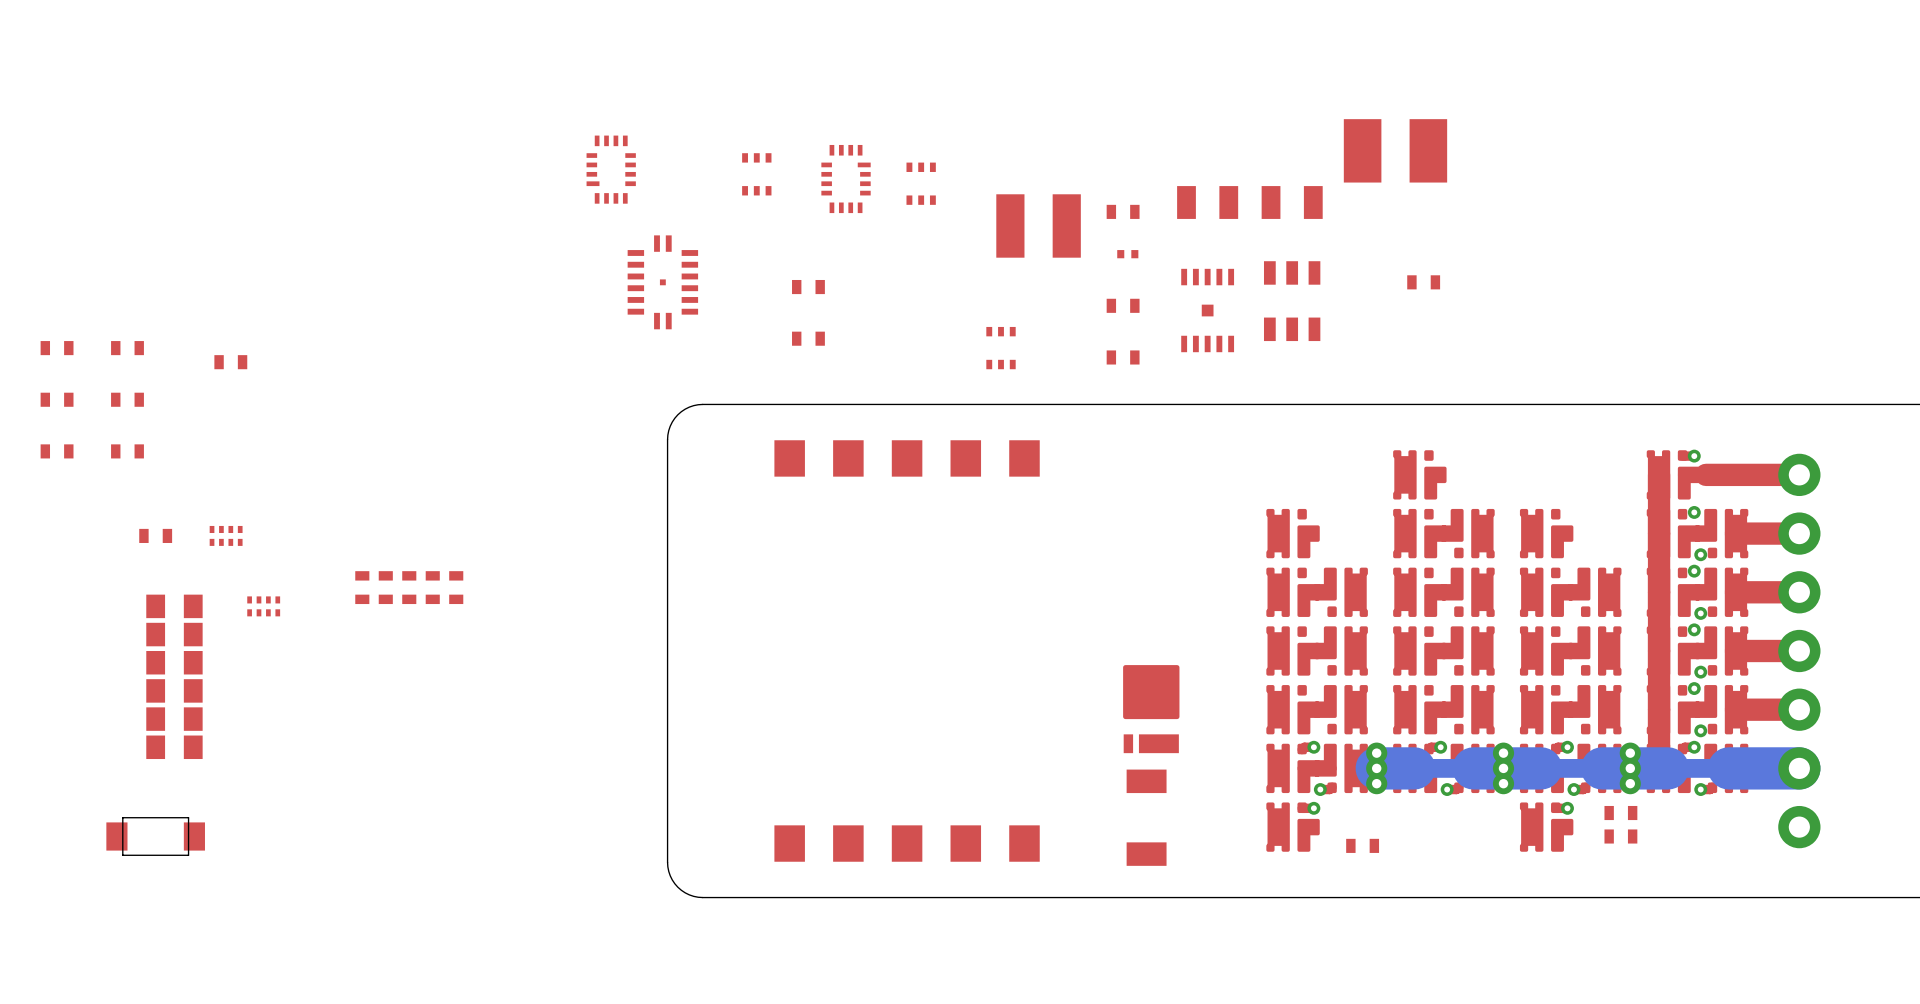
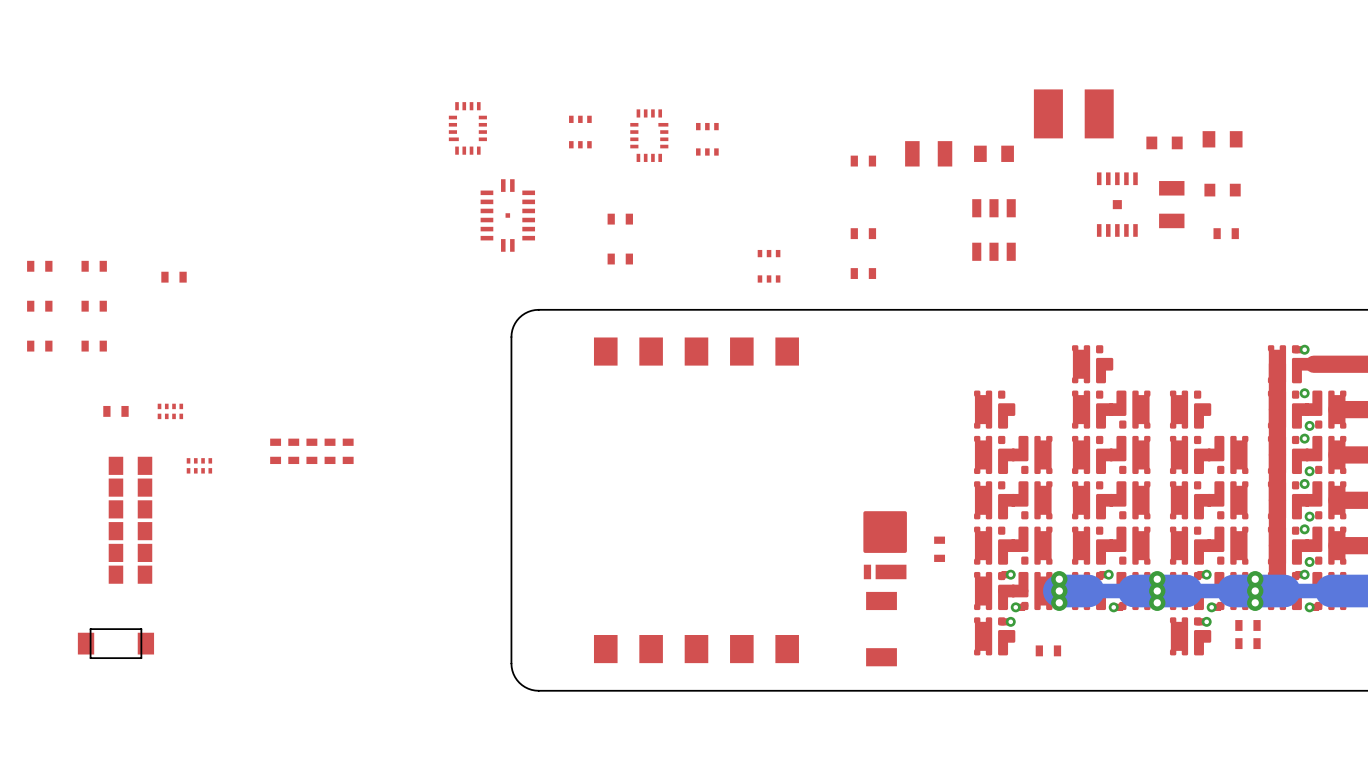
part: none -> (1222, 139)
part footprint: [1261, 186, 1323, 219] -> [974, 145, 1014, 162]
part: none -> (1164, 142)
part: (1038, 225) -> none
part: none -> (1222, 190)
part: (1127, 254) -> none
part: none -> (1171, 204)
part position: (1423, 282) -> (1226, 233)
part position: (1207, 310) -> (1117, 204)
part: none -> (939, 549)

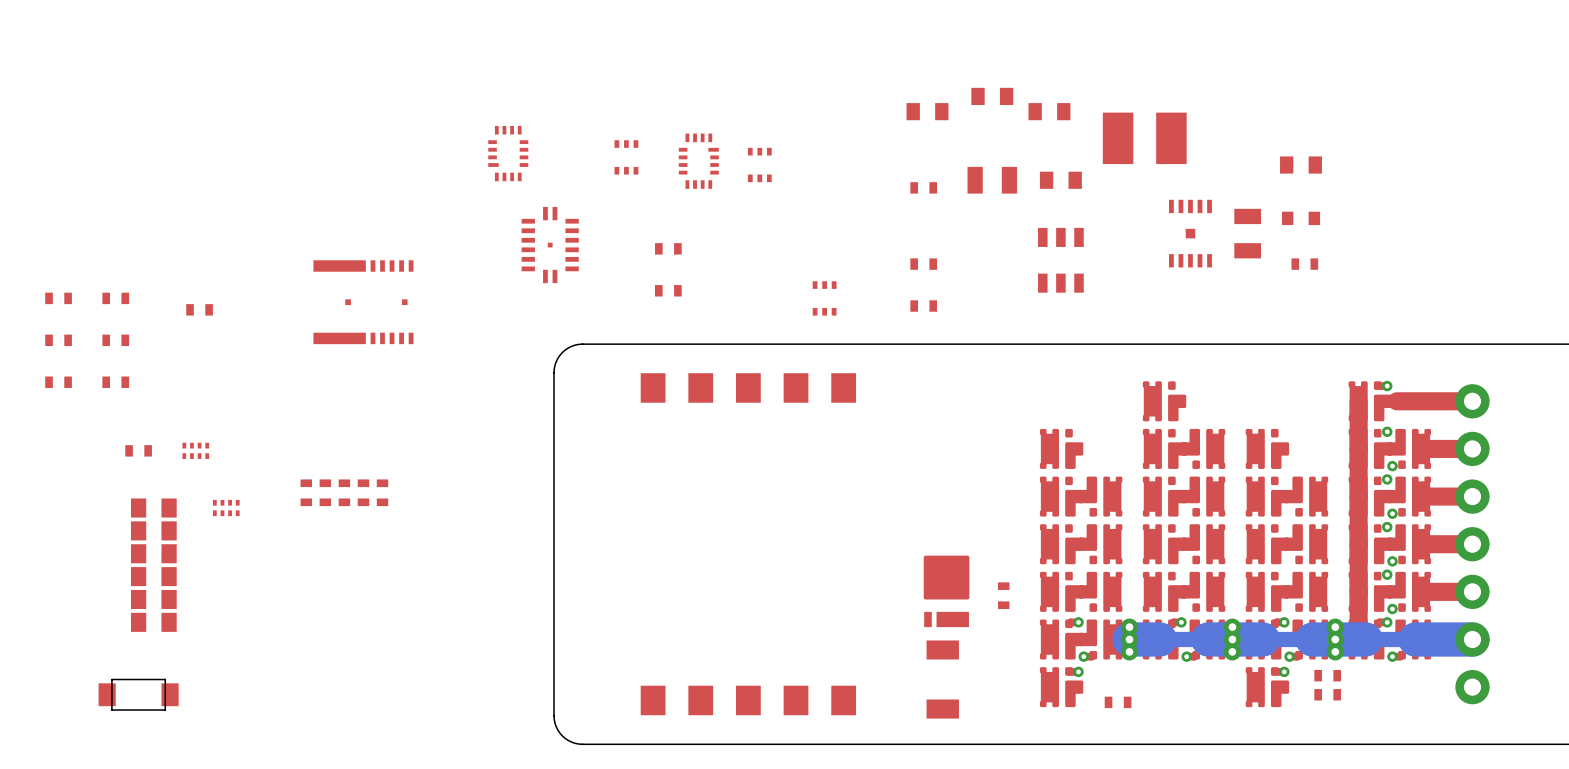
part: none -> (992, 96)
part: none -> (927, 111)
part: none -> (1049, 111)
part: (1164, 142) -> none
part: none -> (363, 302)

